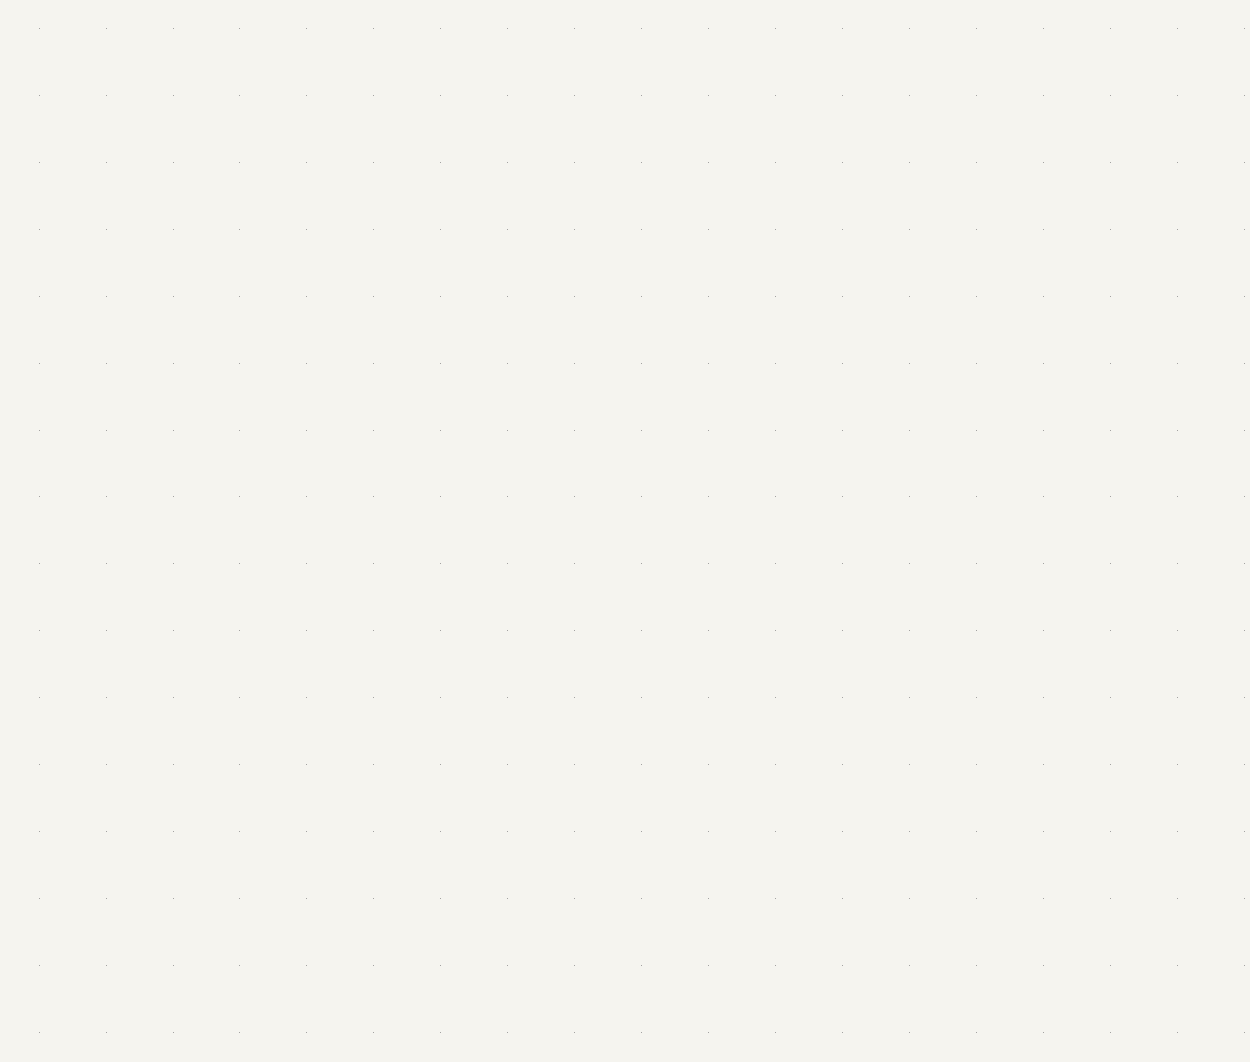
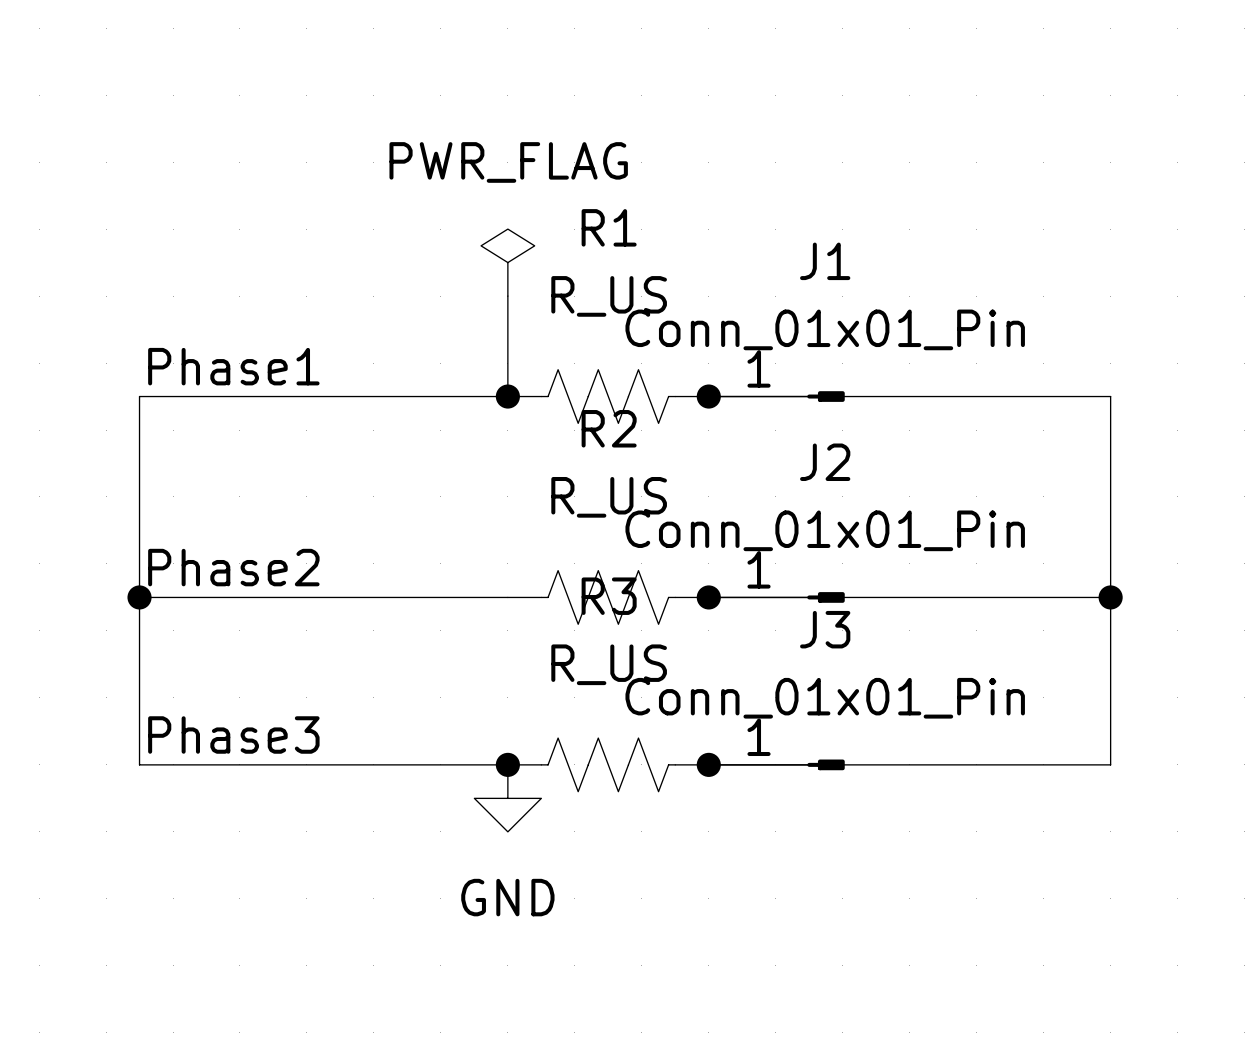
power symbol: none -> PWR_FLAG (507, 262)
wire: none -> (507, 296) (507, 396) (139, 396) (139, 764) (507, 764)
label: none -> Phase1 (233, 366)
junction: none -> (507, 396)
R1: none -> R_US (608, 396)
wire: none -> (708, 396) (1110, 396) (1110, 764) (708, 764)
junction: none -> (708, 396)
J1: none -> Conn_01x01_Pin (776, 396)
label: none -> Phase2 (233, 567)
wire: none -> (139, 597) (507, 597)
junction: none -> (139, 597)
R2: none -> R_US (608, 597)
wire: none -> (708, 597) (1110, 597)
junction: none -> (708, 597)
J2: none -> Conn_01x01_Pin (776, 597)
junction: none -> (1110, 597)
label: none -> Phase3 (233, 735)
junction: none -> (507, 764)
R3: none -> R_US (608, 764)
junction: none -> (708, 764)
J3: none -> Conn_01x01_Pin (776, 764)
power symbol: none -> GND (507, 798)

